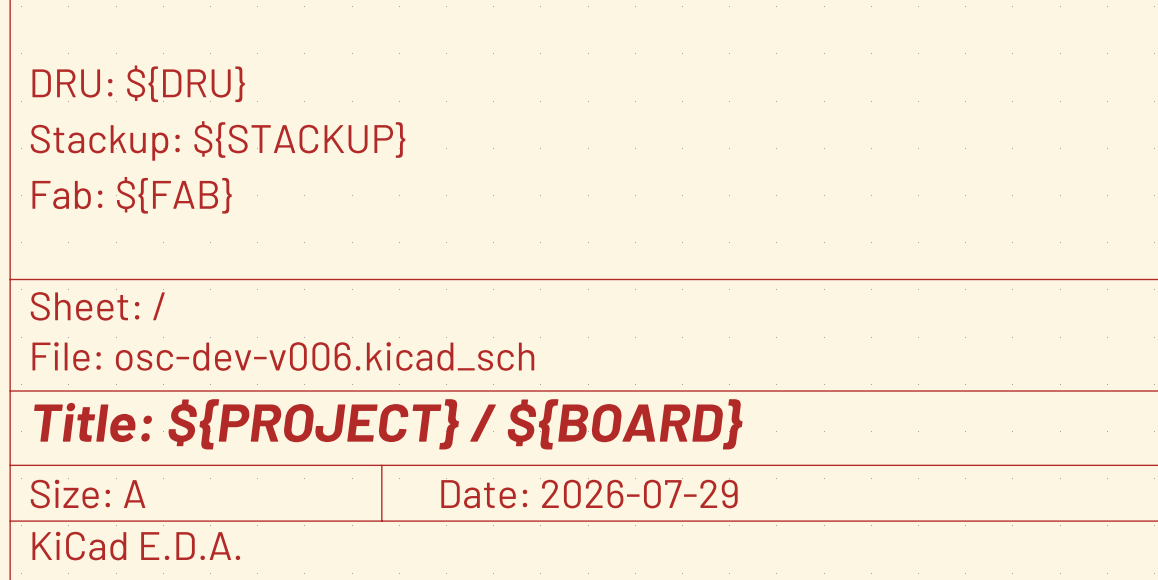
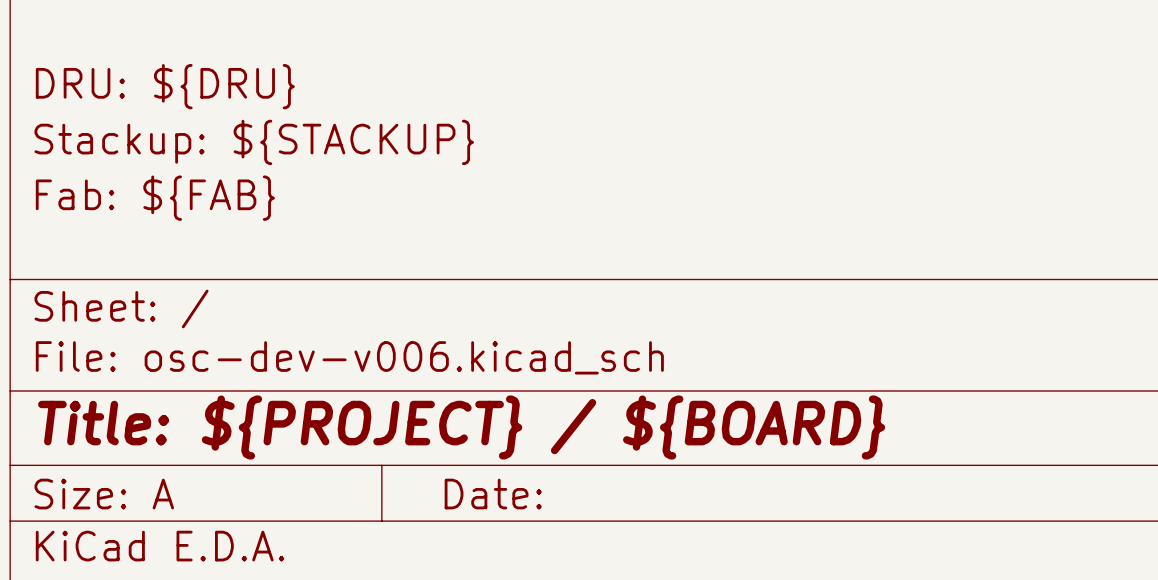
title block: Date: 2026-07-29 (589, 494) -> Date: (493, 494)

